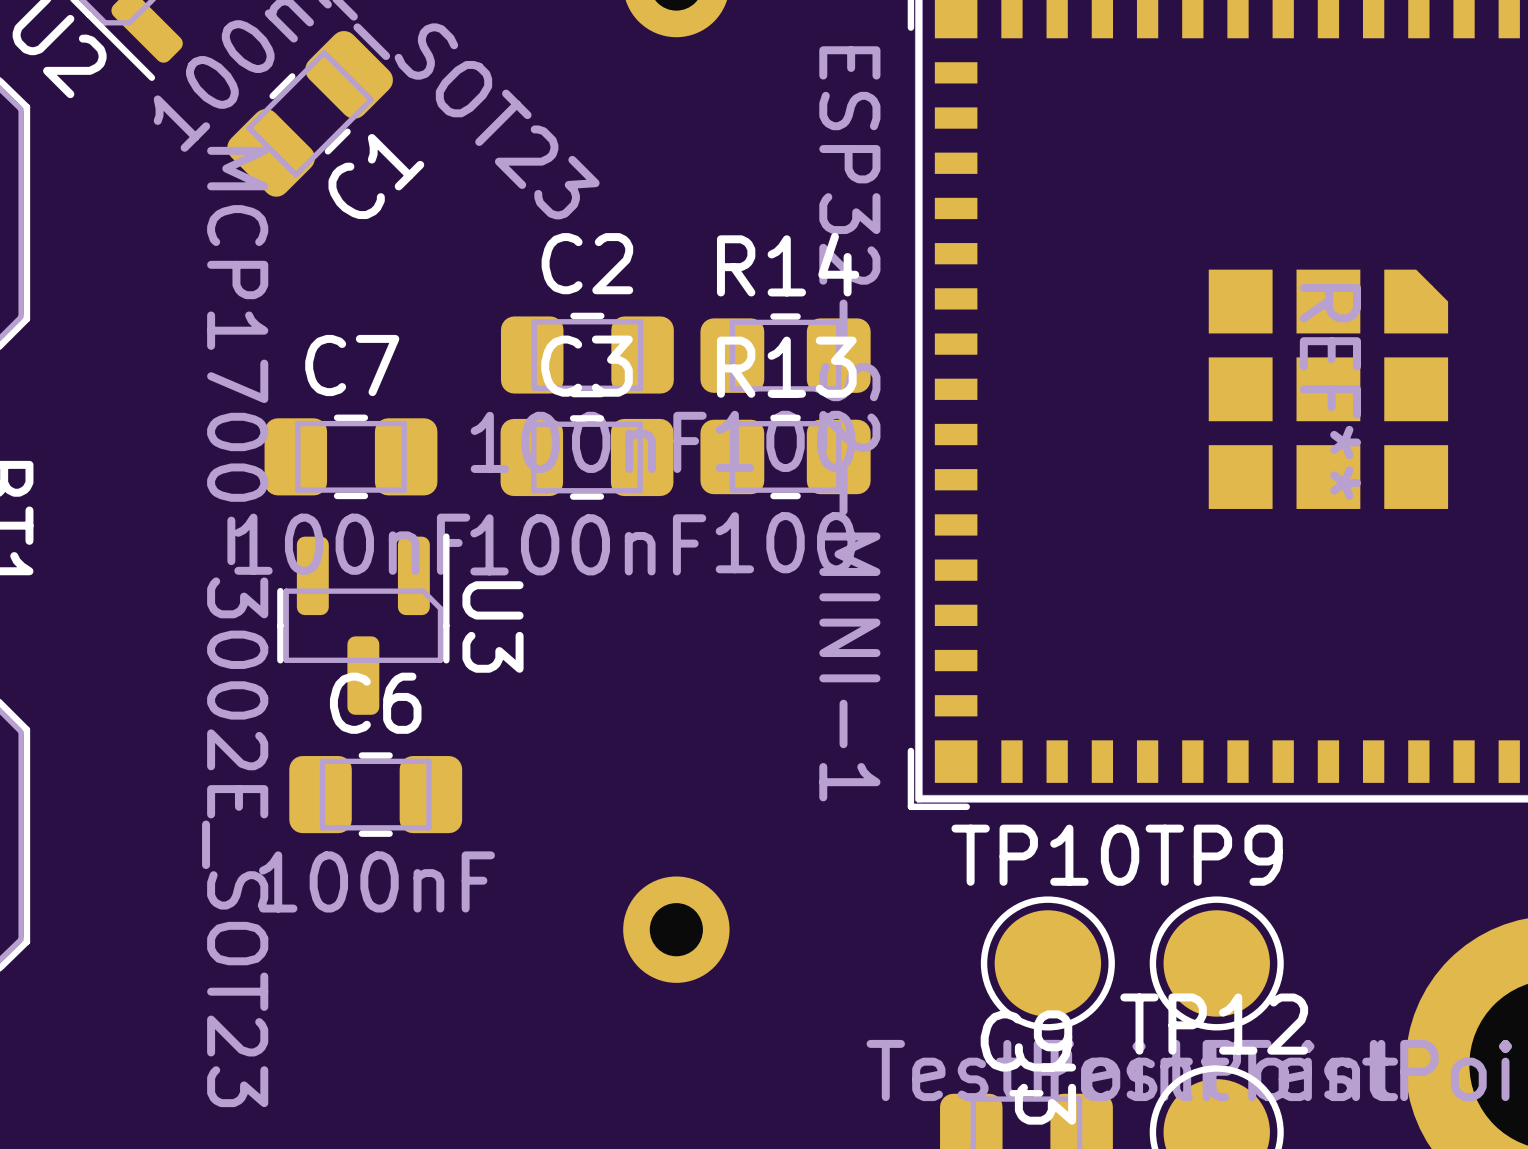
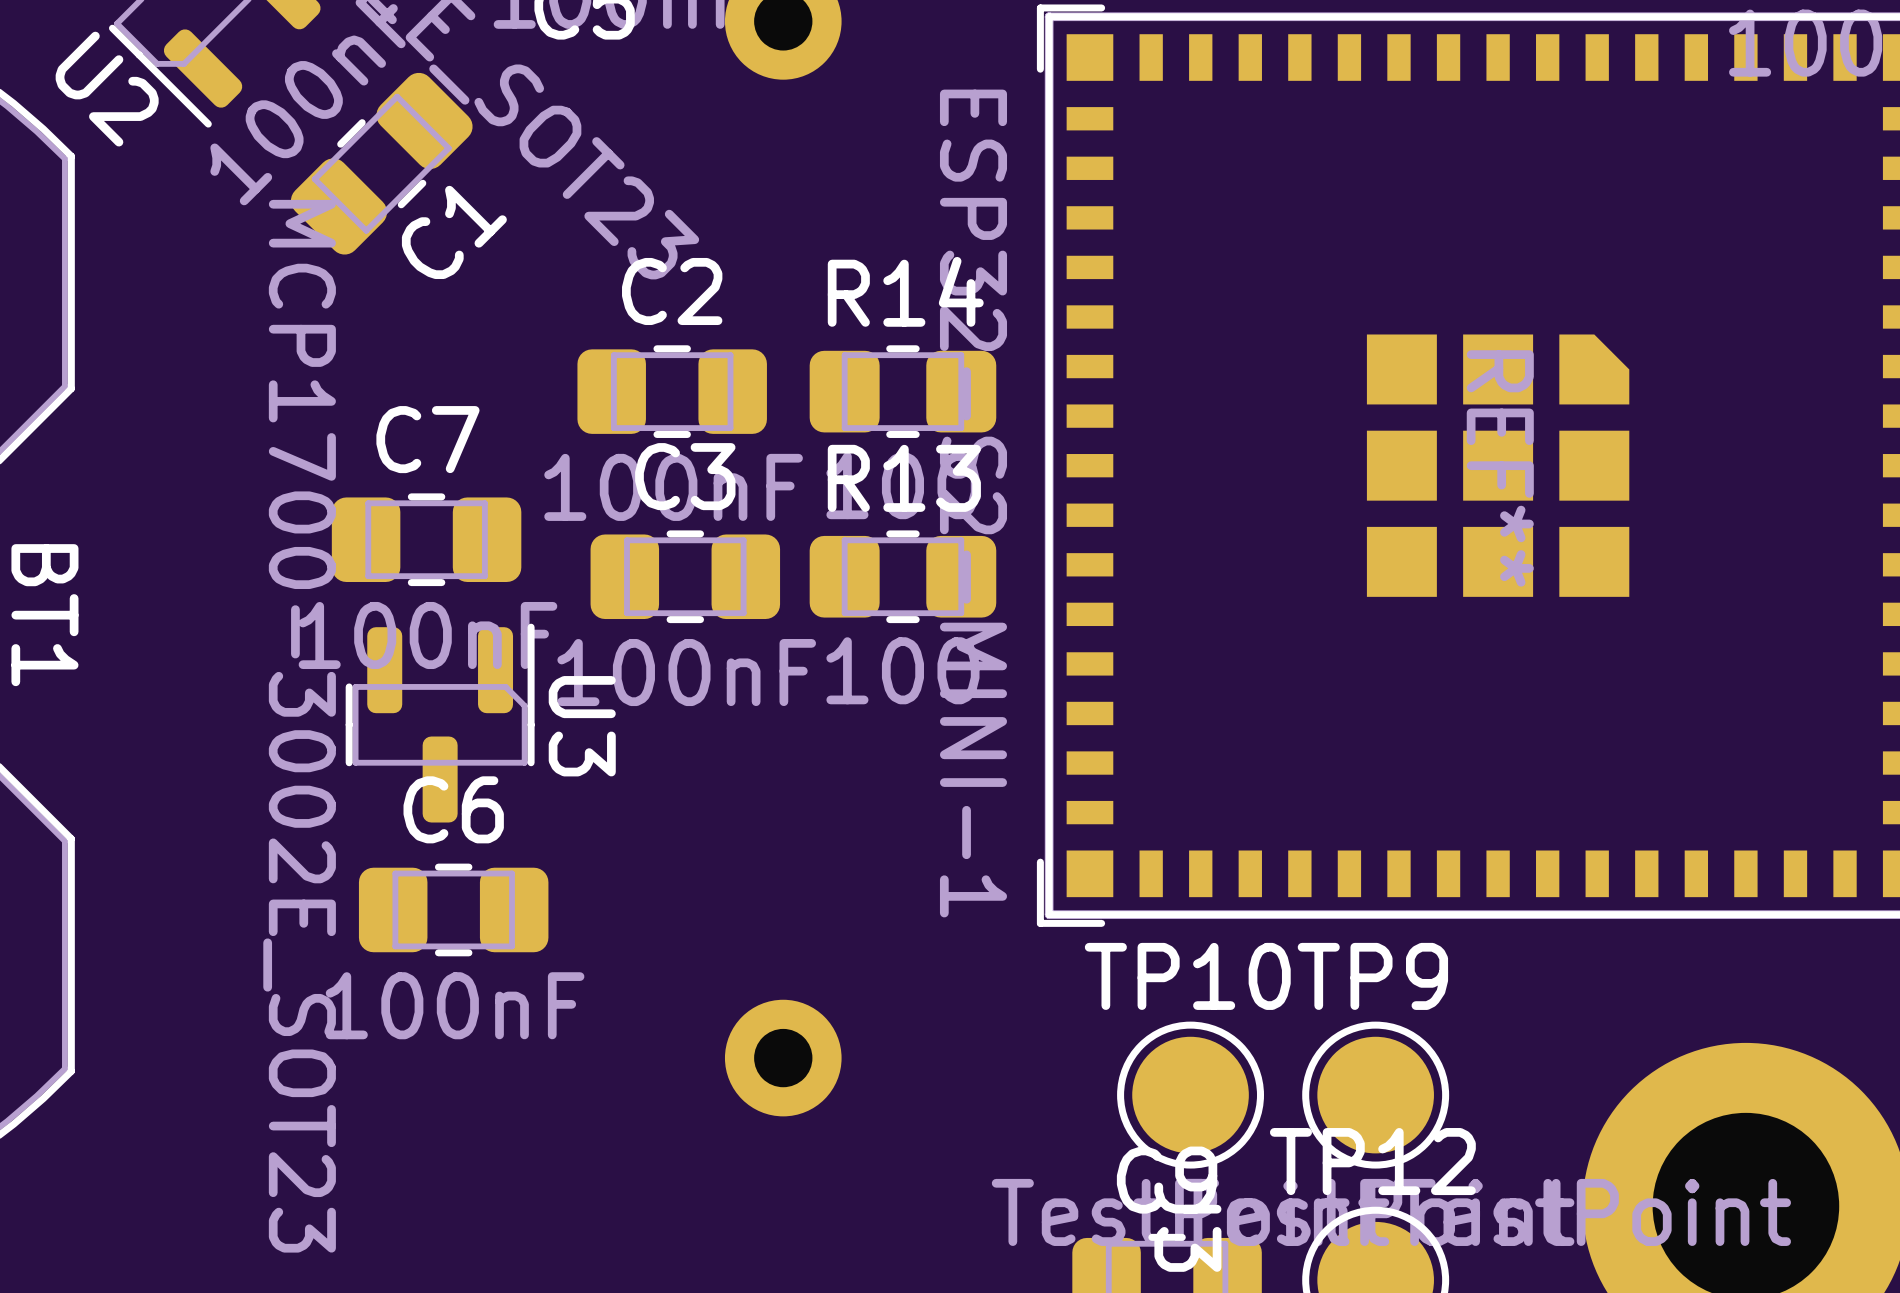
C2 position: (587, 355) -> (672, 391)
R14 position: (785, 355) -> (902, 391)
R13 position: (785, 456) -> (902, 576)
C3 position: (587, 457) -> (685, 576)

